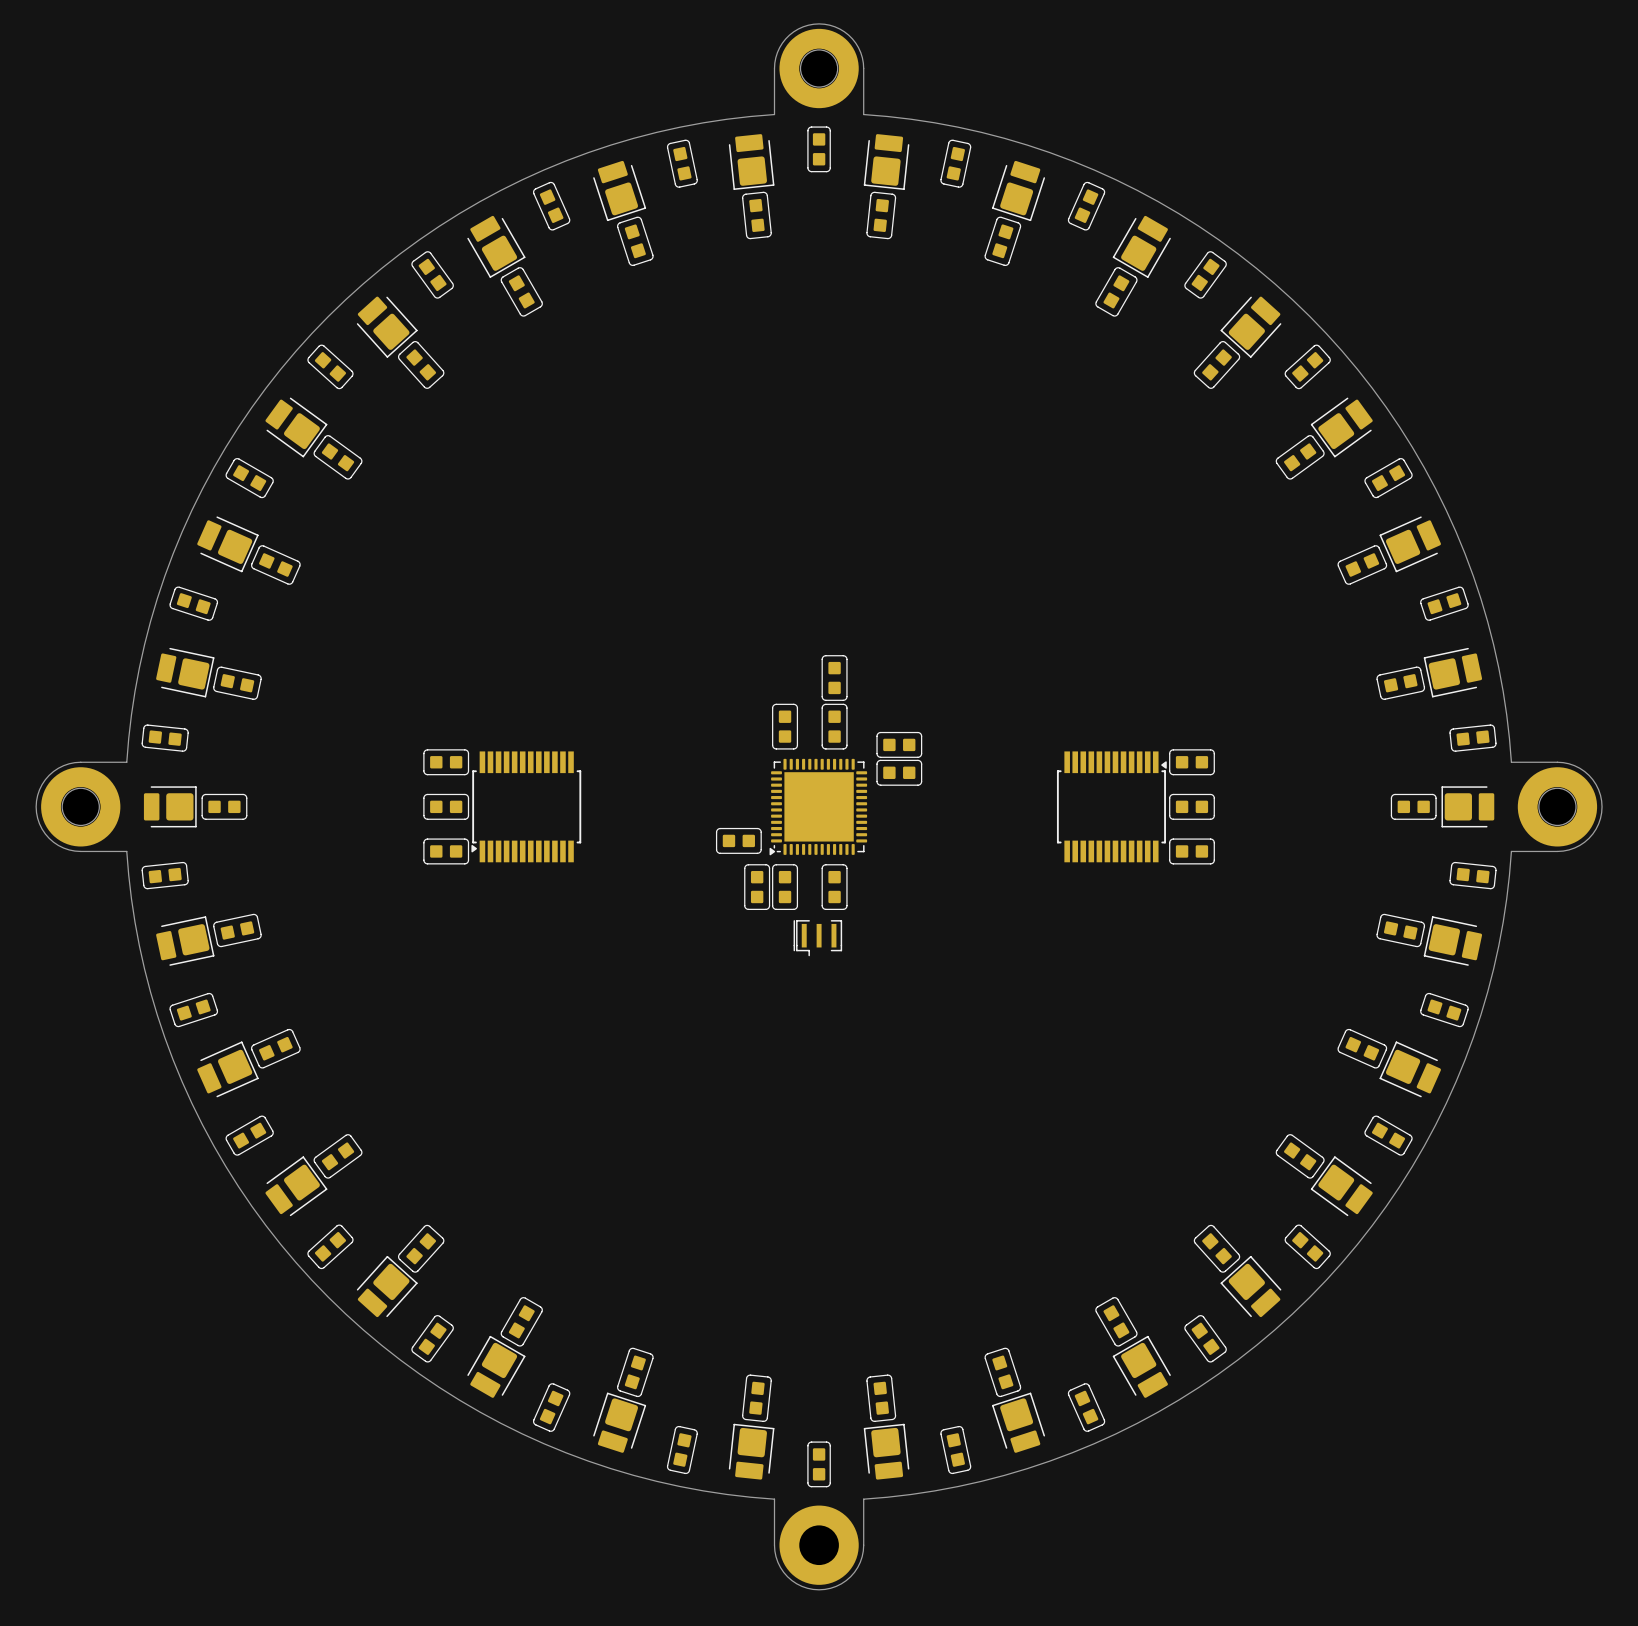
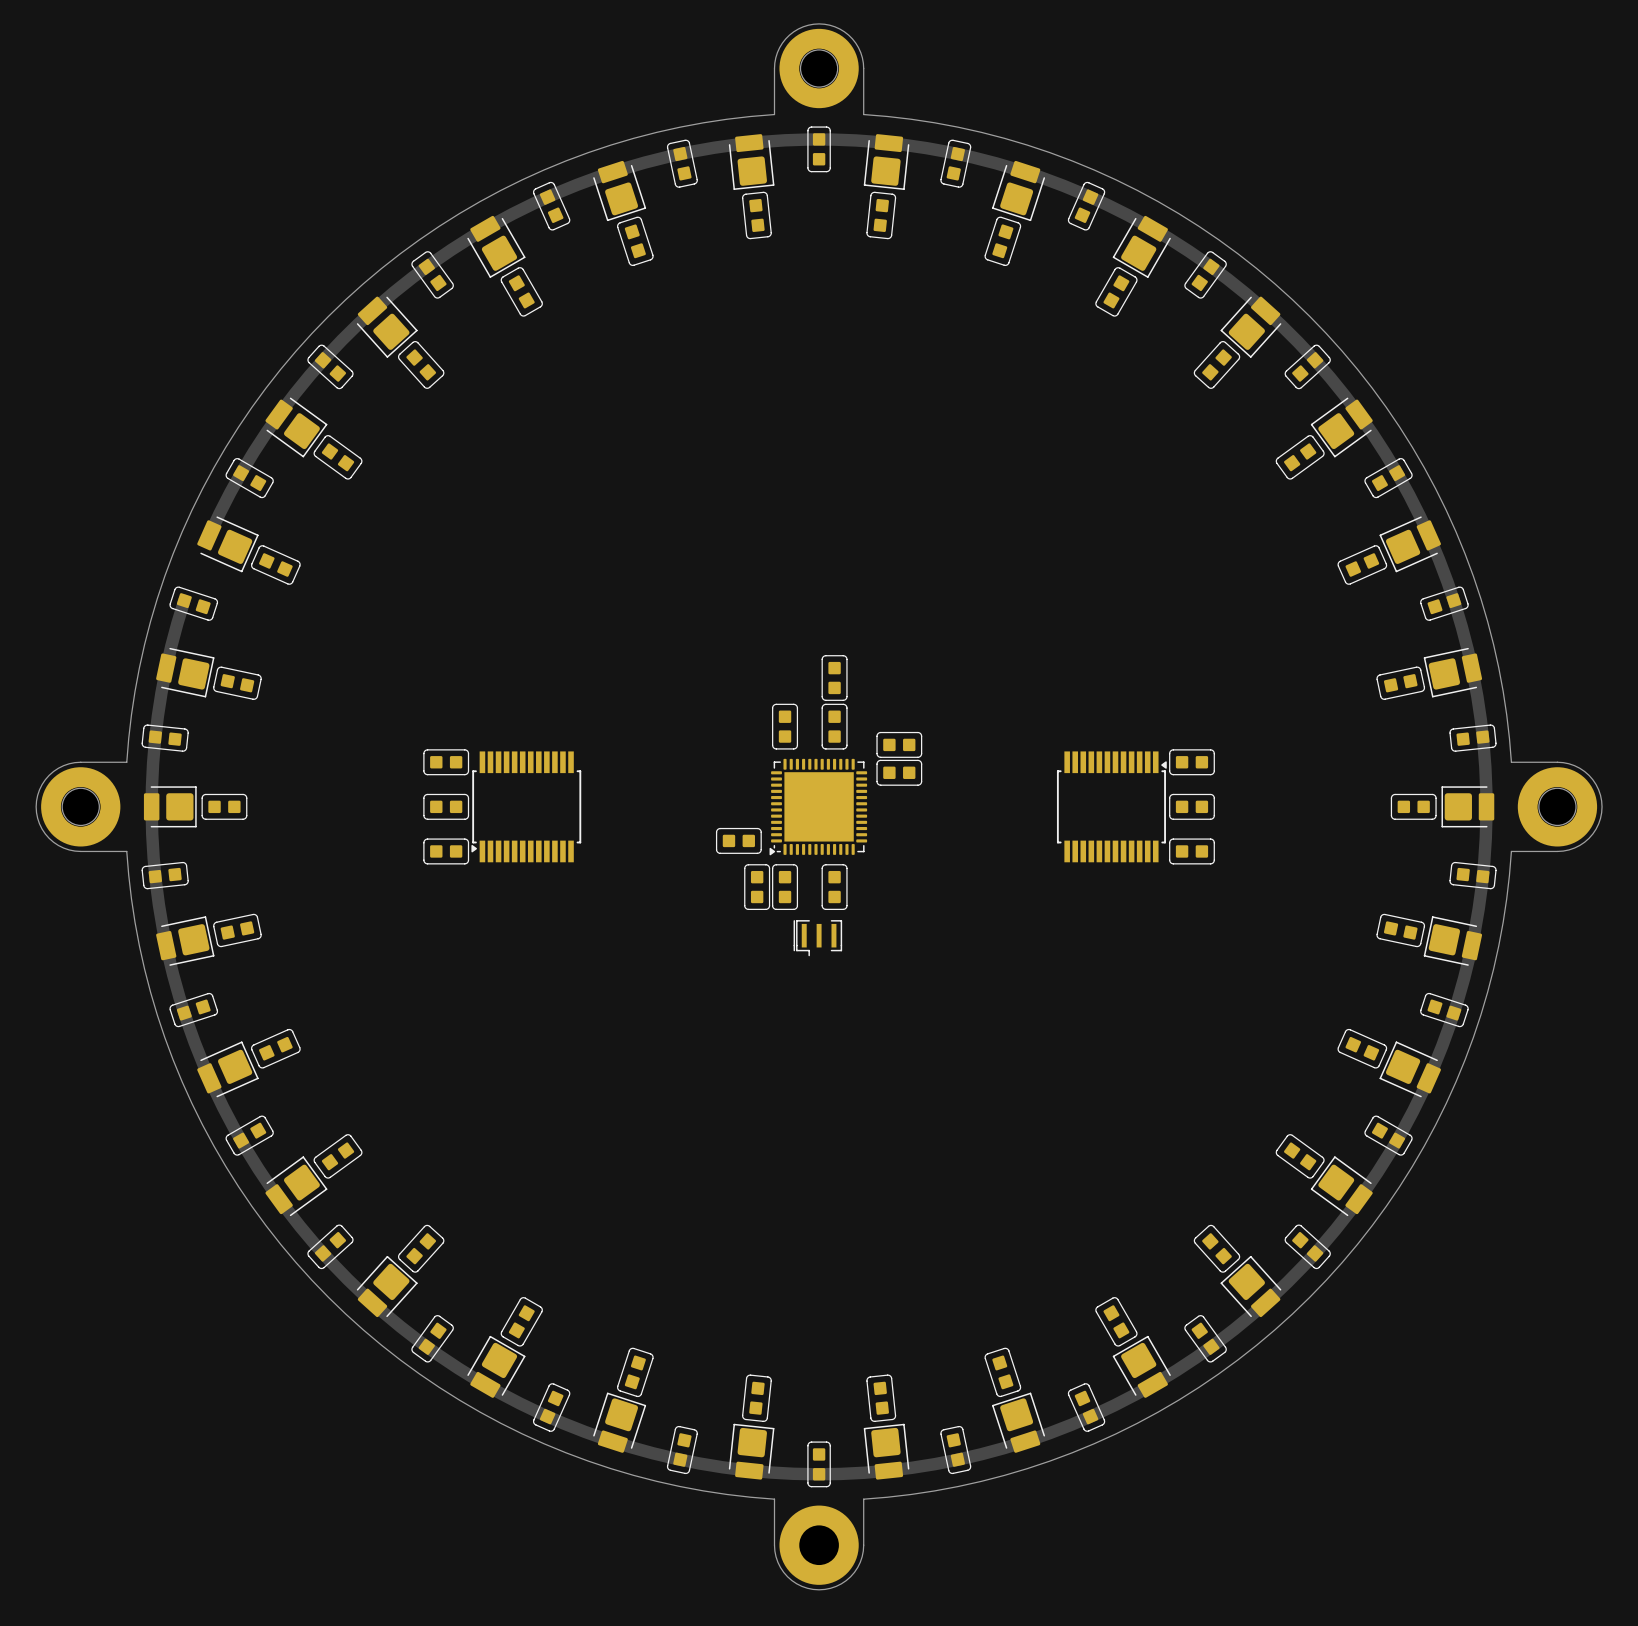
track: none -> (209, 535) (230, 492) (266, 431) (294, 393) (341, 340) (394, 292) (451, 249) (491, 225) (555, 193) (622, 169) (690, 151) (761, 141) (808, 139) (879, 142) (949, 152) (1018, 170) (1063, 185) (1106, 204) (1169, 238) (1227, 279) (1281, 325) (1314, 359) (1359, 414) (1397, 474) (1429, 537) (1455, 604) (1467, 650) (1480, 719) (1486, 790) (1485, 838) (1478, 908) (1464, 978) (1442, 1046) (1423, 1089) (1390, 1152) (1350, 1211) (1304, 1265) (1252, 1314) (1196, 1357) (1156, 1382) (1093, 1415) (1049, 1433) (981, 1454) (911, 1467) (840, 1473) (793, 1473) (722, 1467) (652, 1453) (585, 1431) (520, 1403) (458, 1368) (400, 1326) (364, 1295) (315, 1244) (285, 1207) (245, 1148) (223, 1107) (194, 1042) (173, 974) (162, 928) (153, 857) (151, 810) (155, 739) (166, 669) (184, 600)

